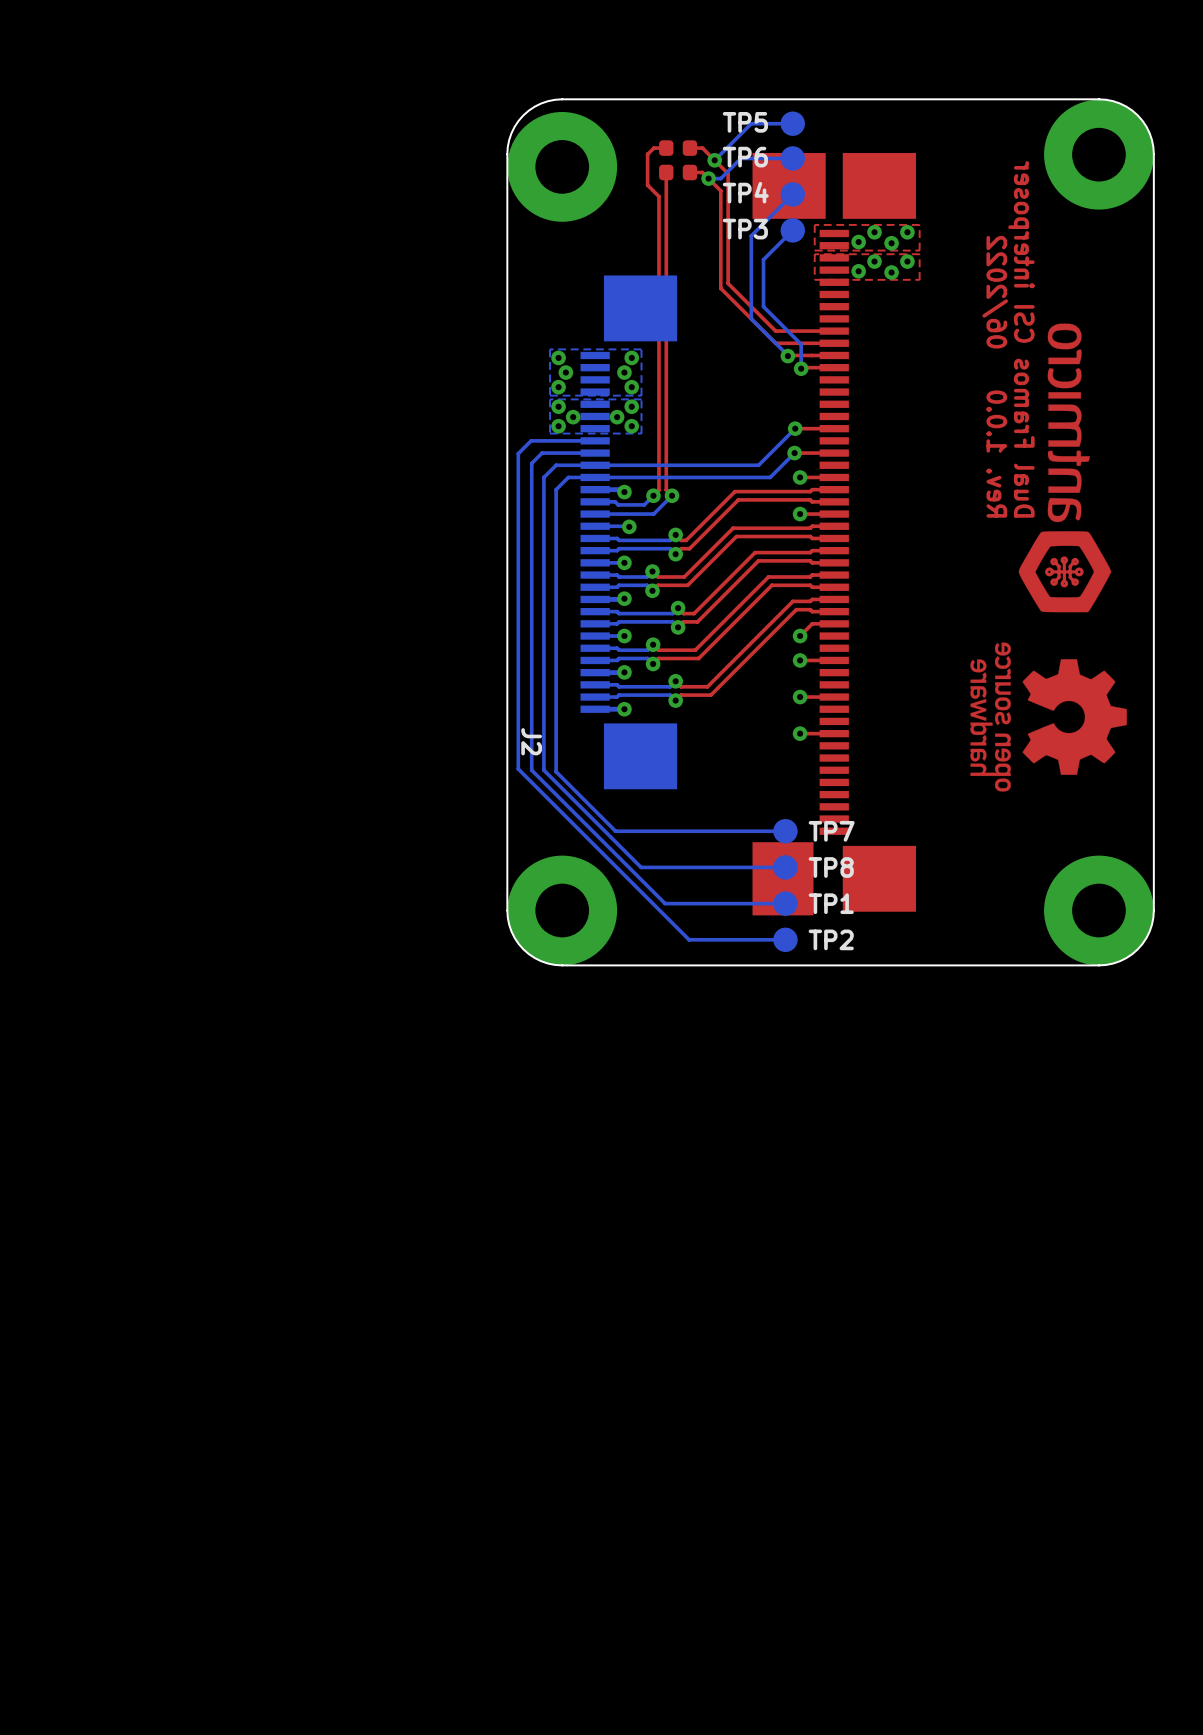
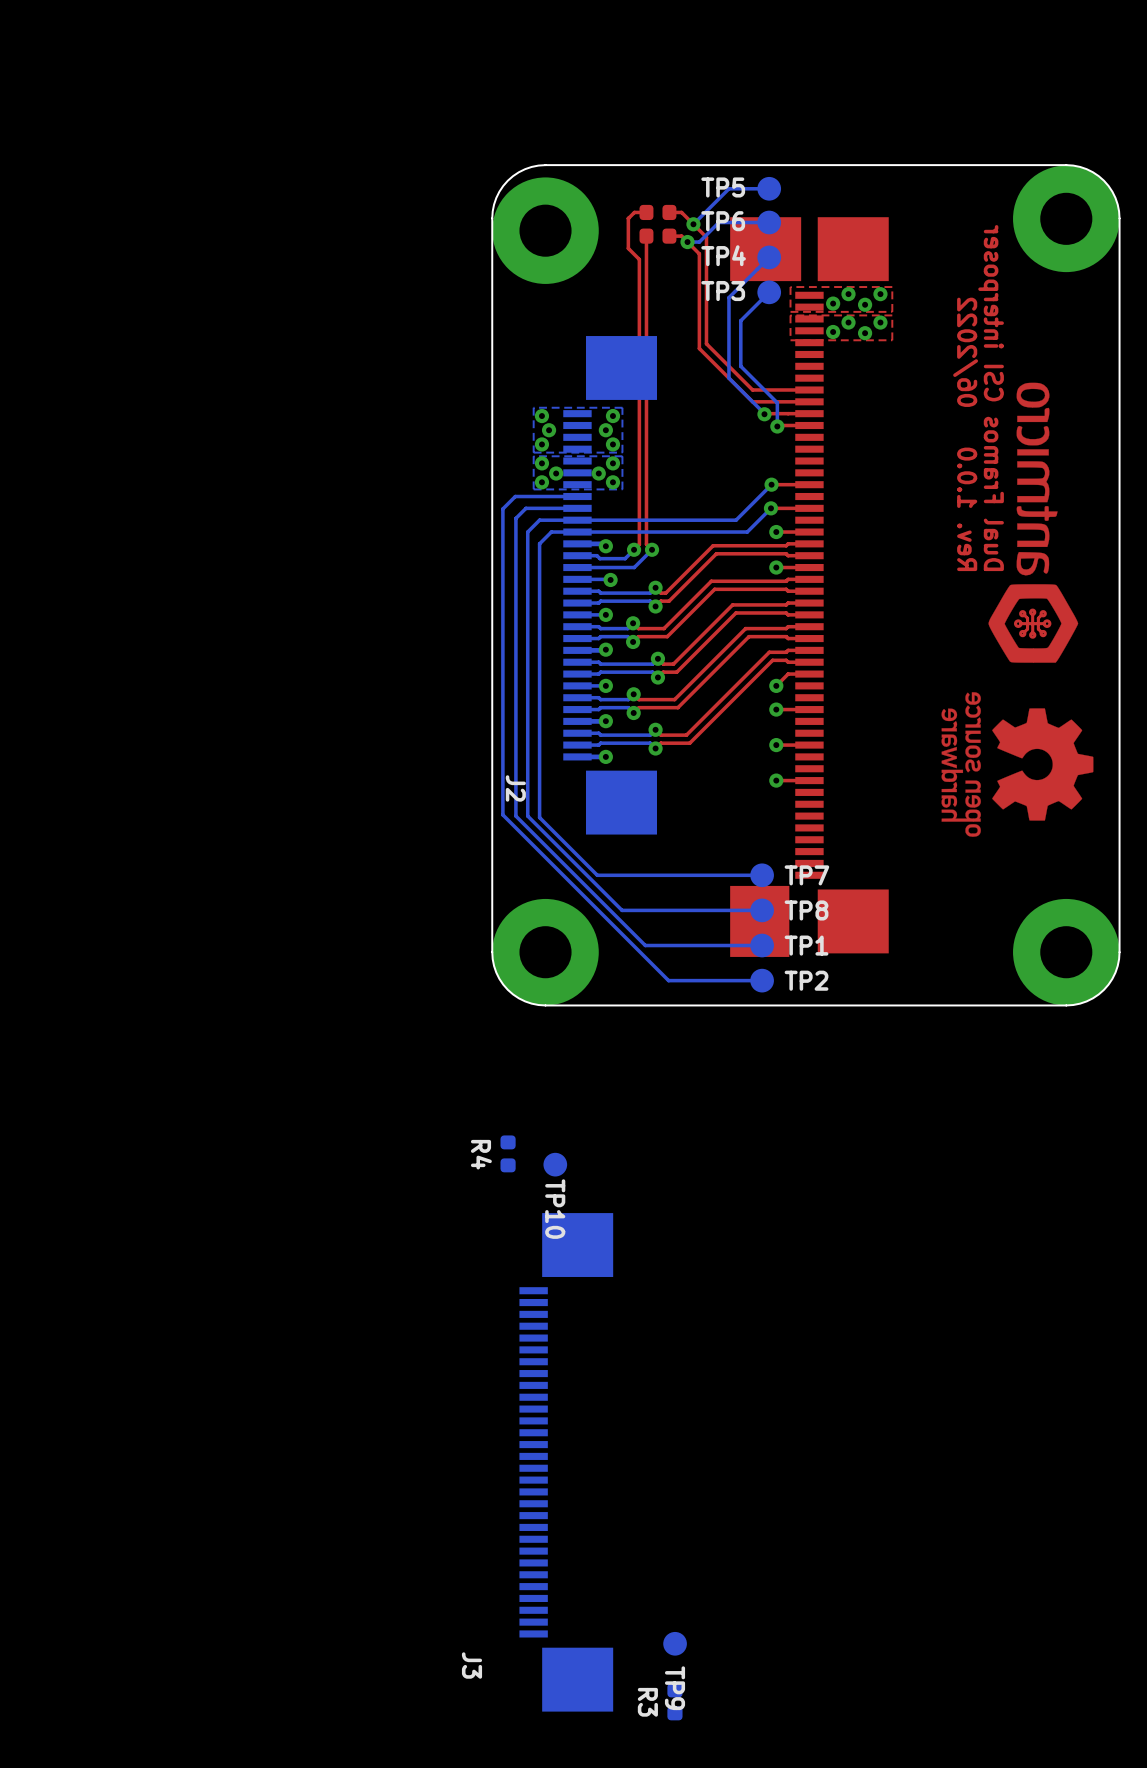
R4: none -> (508, 1153)
TP10: none -> (555, 1164)
J3: none -> (566, 1462)
TP9: none -> (675, 1643)
R3: none -> (674, 1701)

